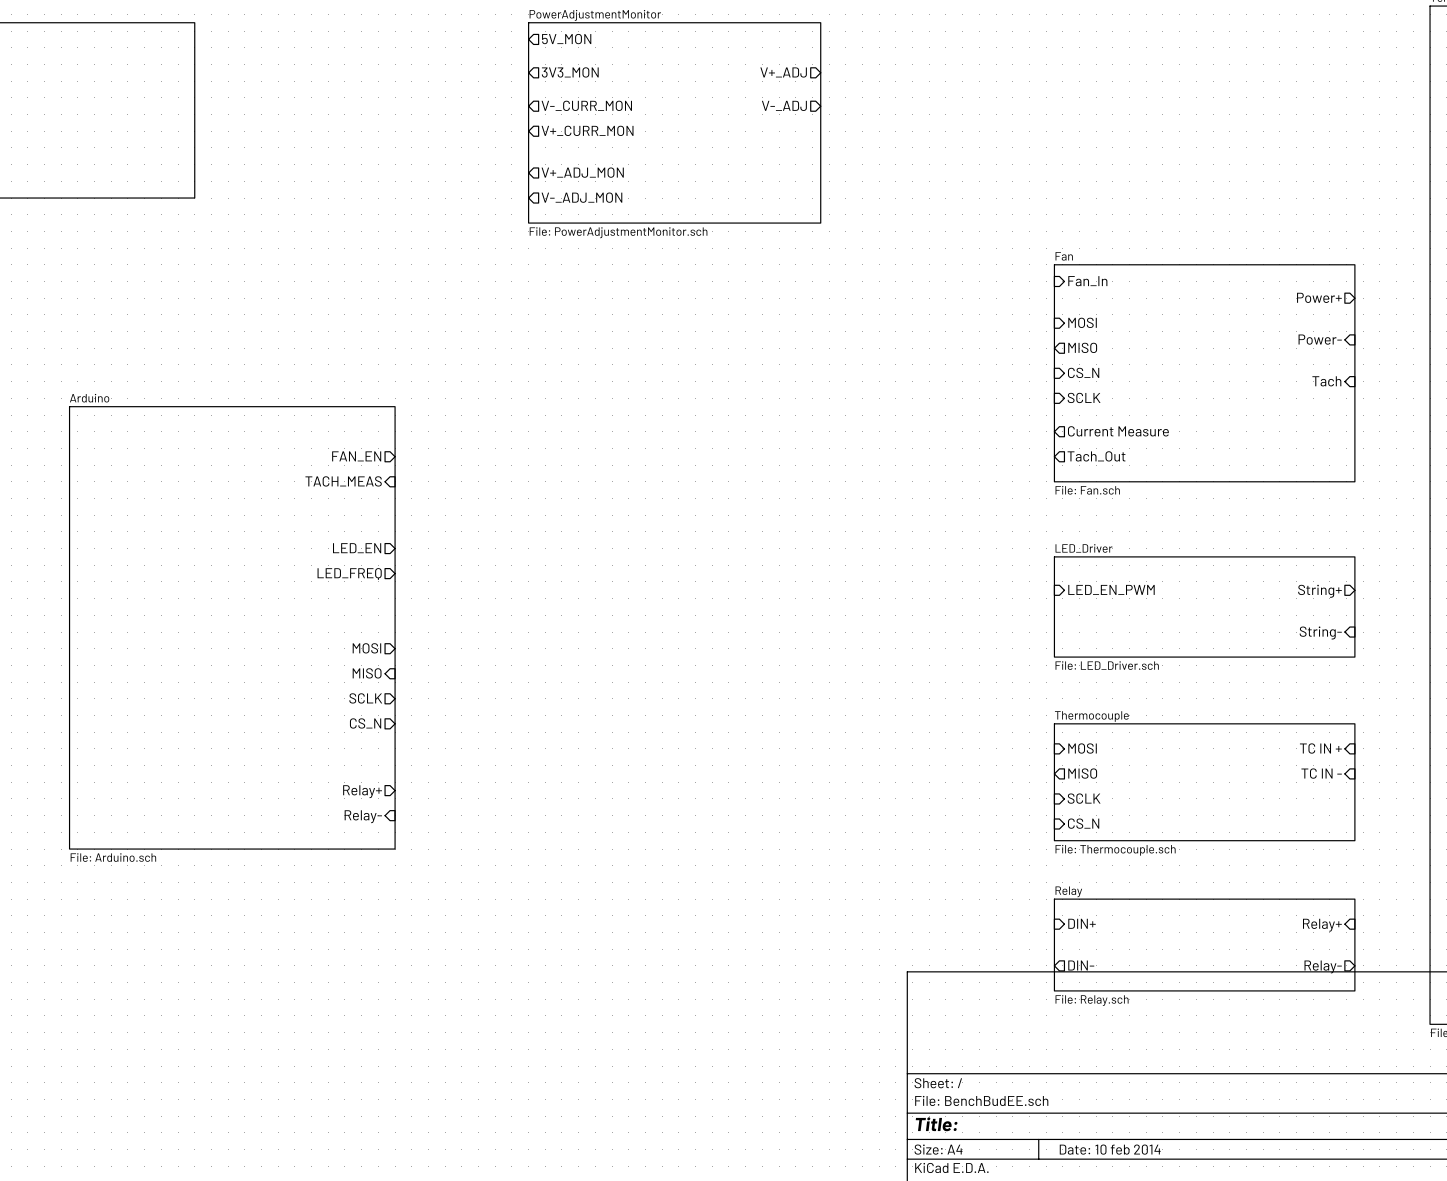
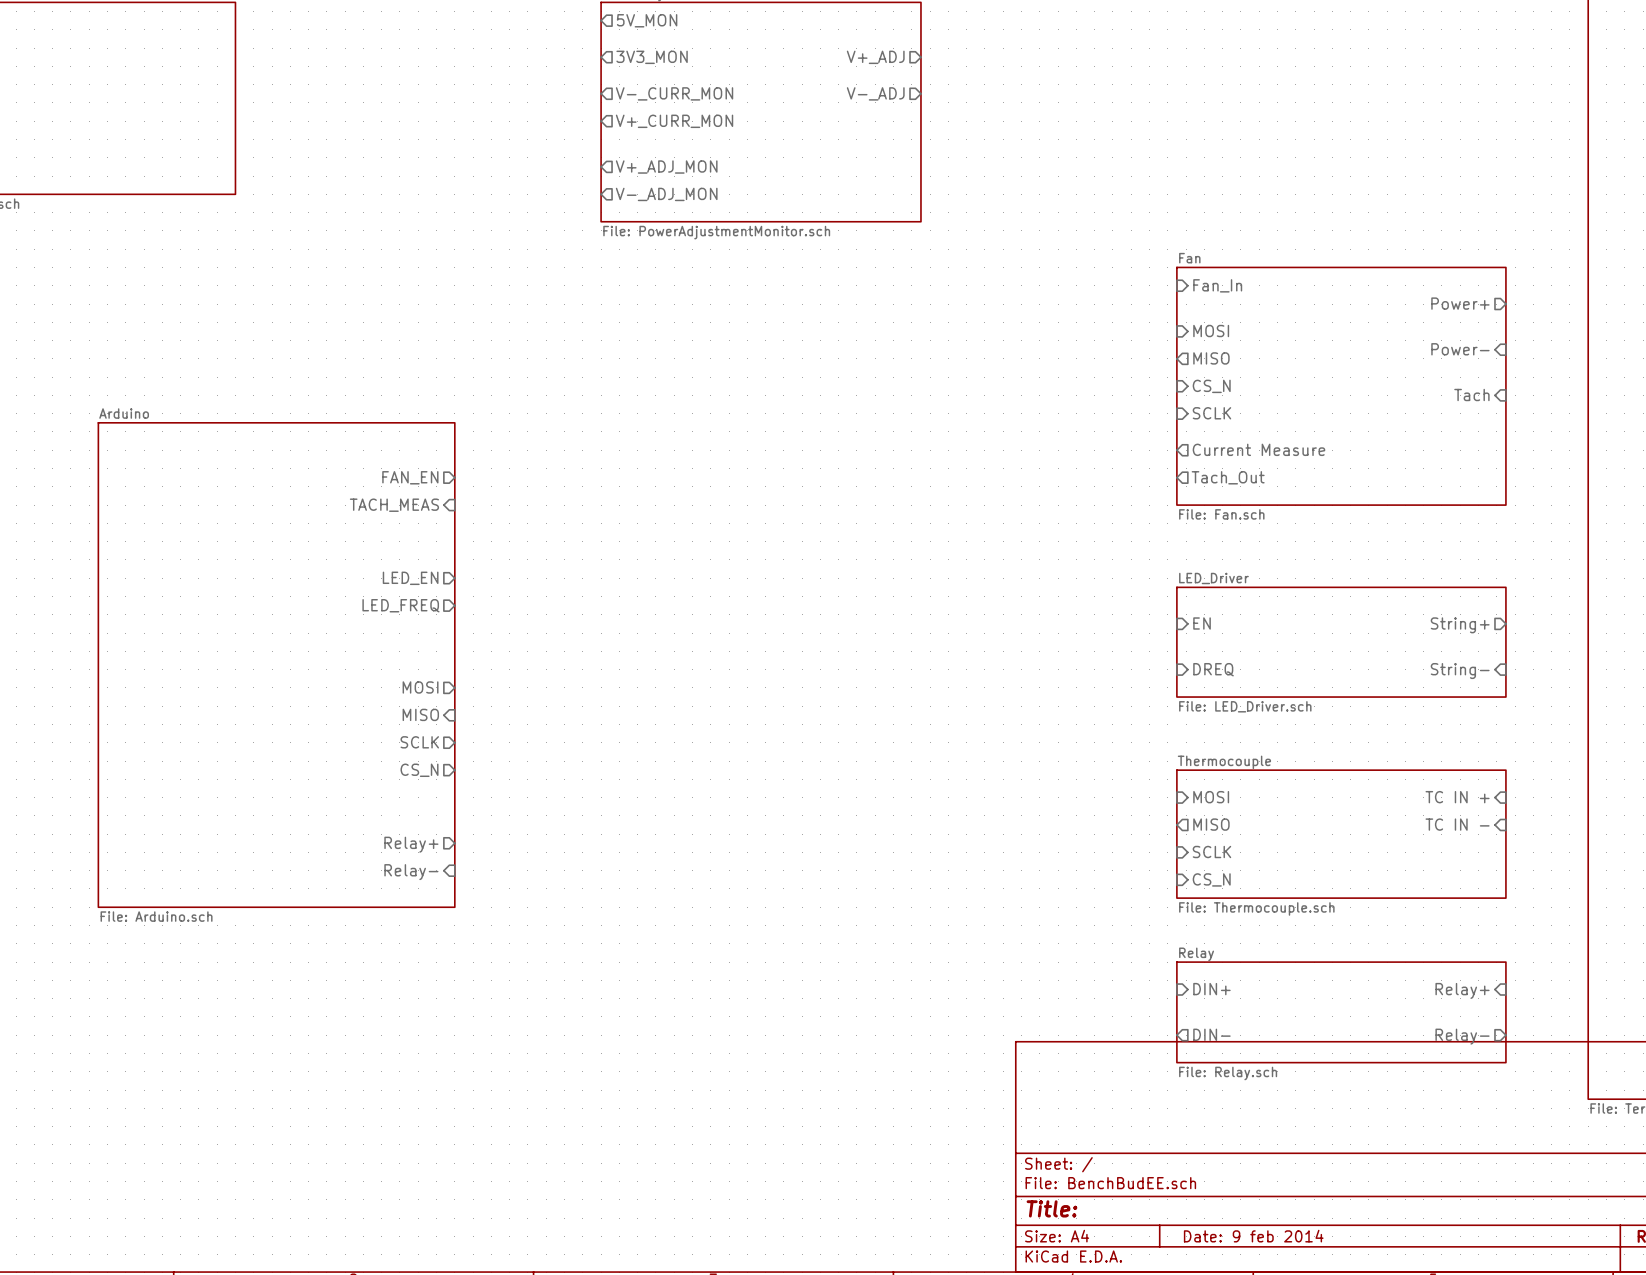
sheet pin: LED_EN_PWM (1111, 589) -> EN (1202, 623)
sheet pin: none -> DREQ (1213, 669)
title block: Date: 10 feb 2014 (1110, 1149) -> Date: 9 feb 2014 (1253, 1236)

